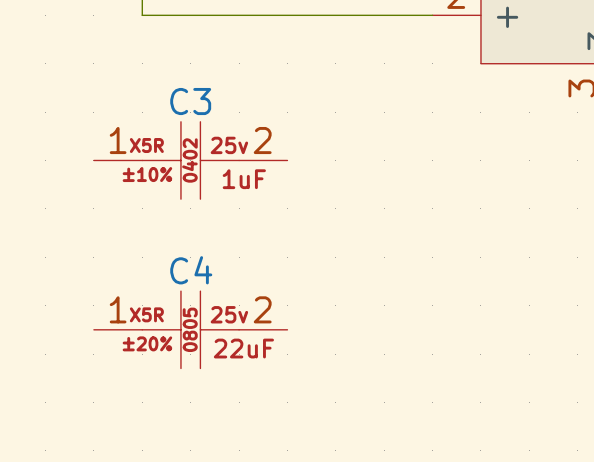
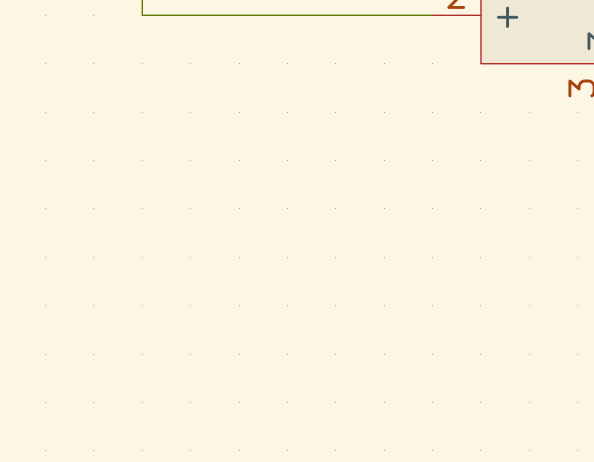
C3: (190, 160) -> none
C4: (190, 329) -> none

